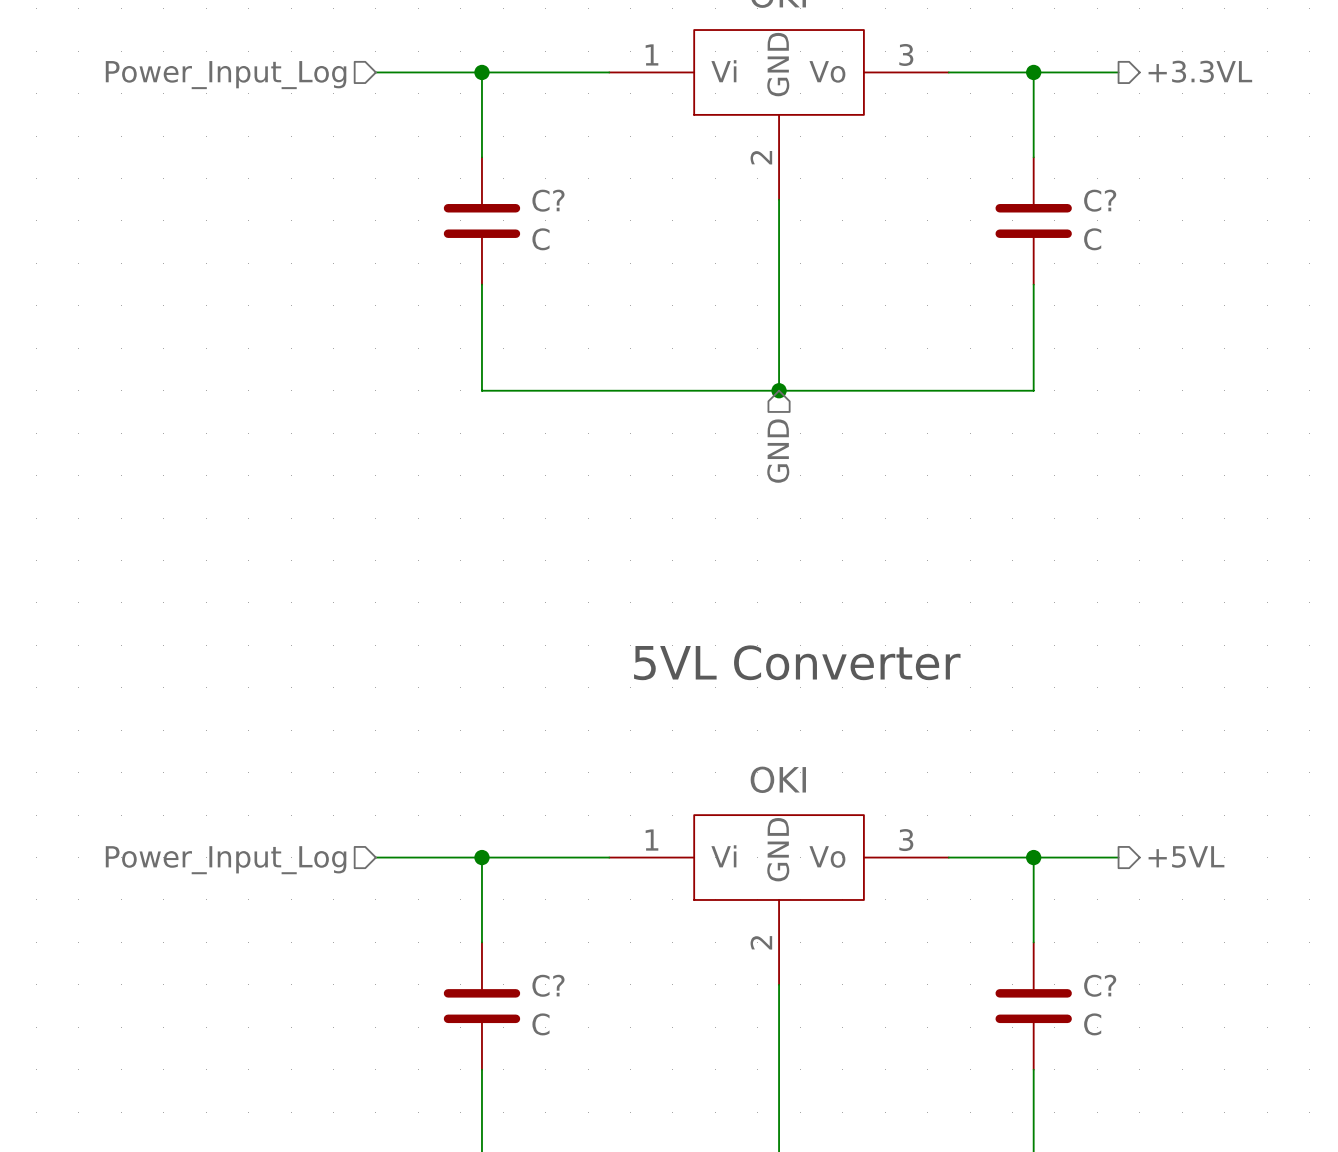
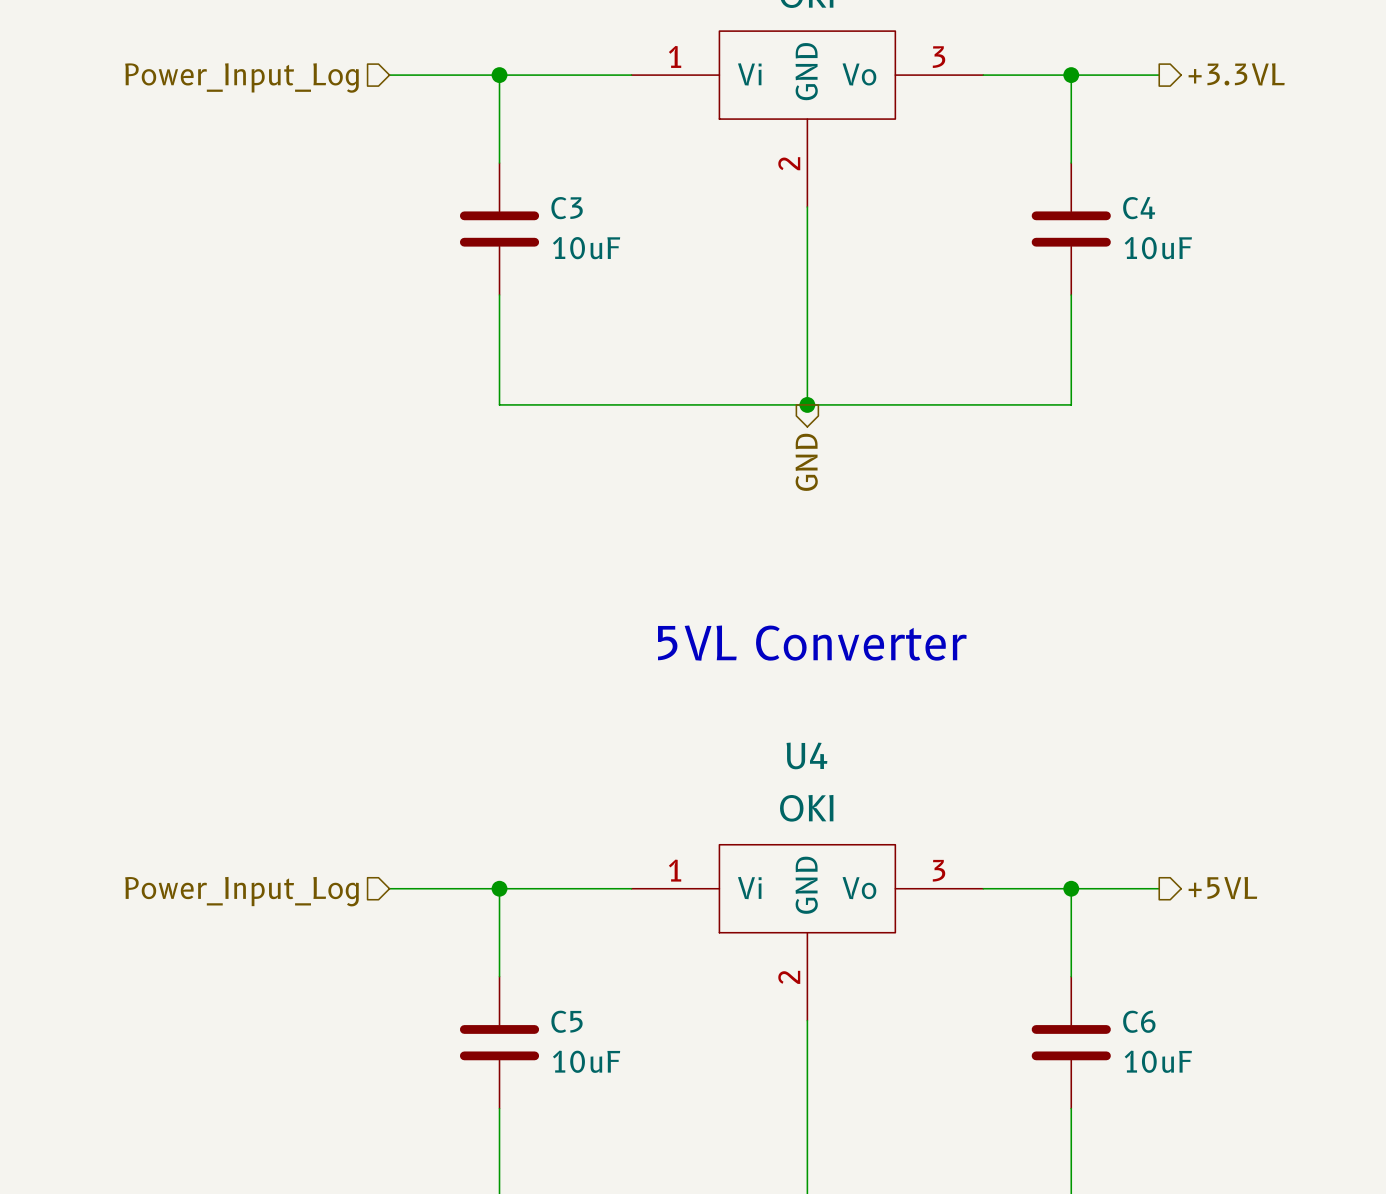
C? name: C? (548, 200) -> C3 (567, 208)
C? name: C? (1100, 200) -> C4 (1139, 208)
C? value: C (540, 239) -> 10uF (586, 248)
C? value: C (1092, 239) -> 10uF (1158, 248)
hierarchical label shape: input (778, 451) -> output (806, 462)
text position: 5VL Converter (797, 662) -> 5VL Converter (812, 643)
U4 name: none -> U4 (806, 755)
C? name: C? (548, 985) -> C5 (567, 1021)
C? name: C? (1100, 985) -> C6 (1139, 1021)
C? value: C (540, 1024) -> 10uF (586, 1061)
C? value: C (1092, 1024) -> 10uF (1158, 1061)

